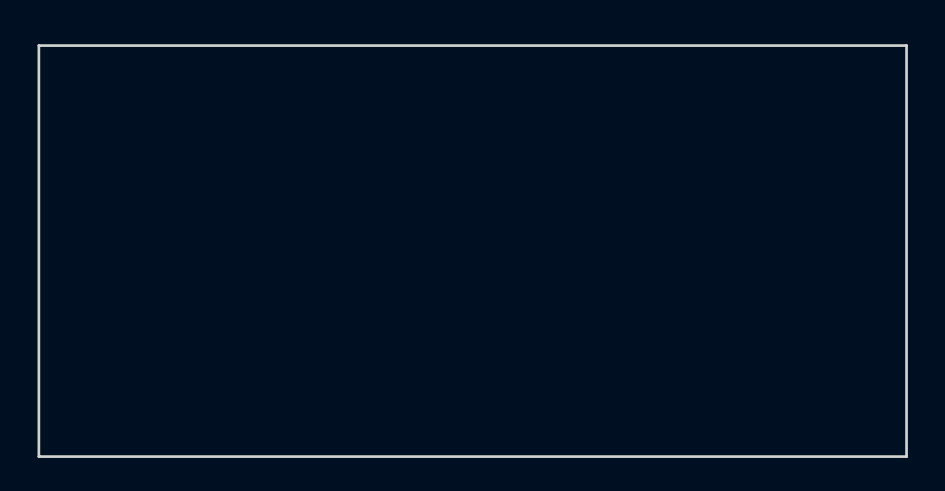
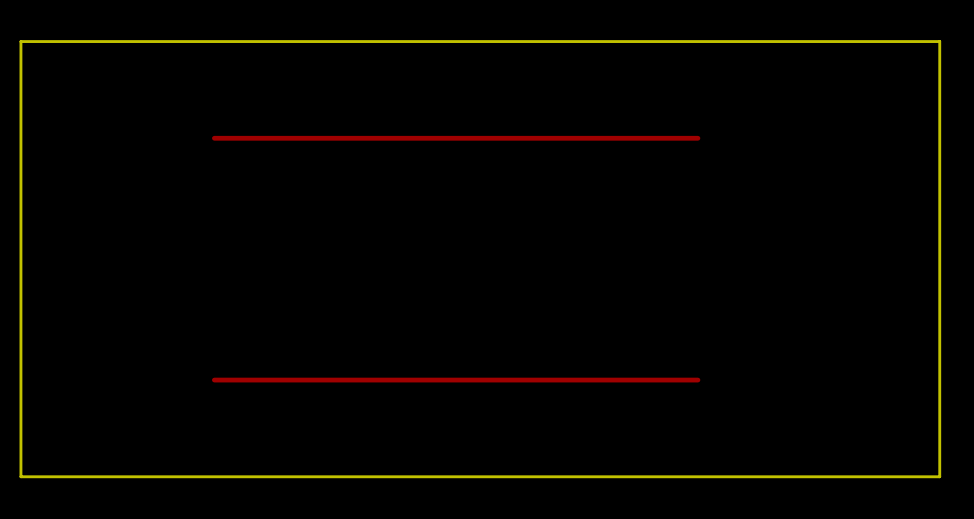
top track: none -> (697, 138) (214, 138)
top track: none -> (697, 380) (214, 380)

